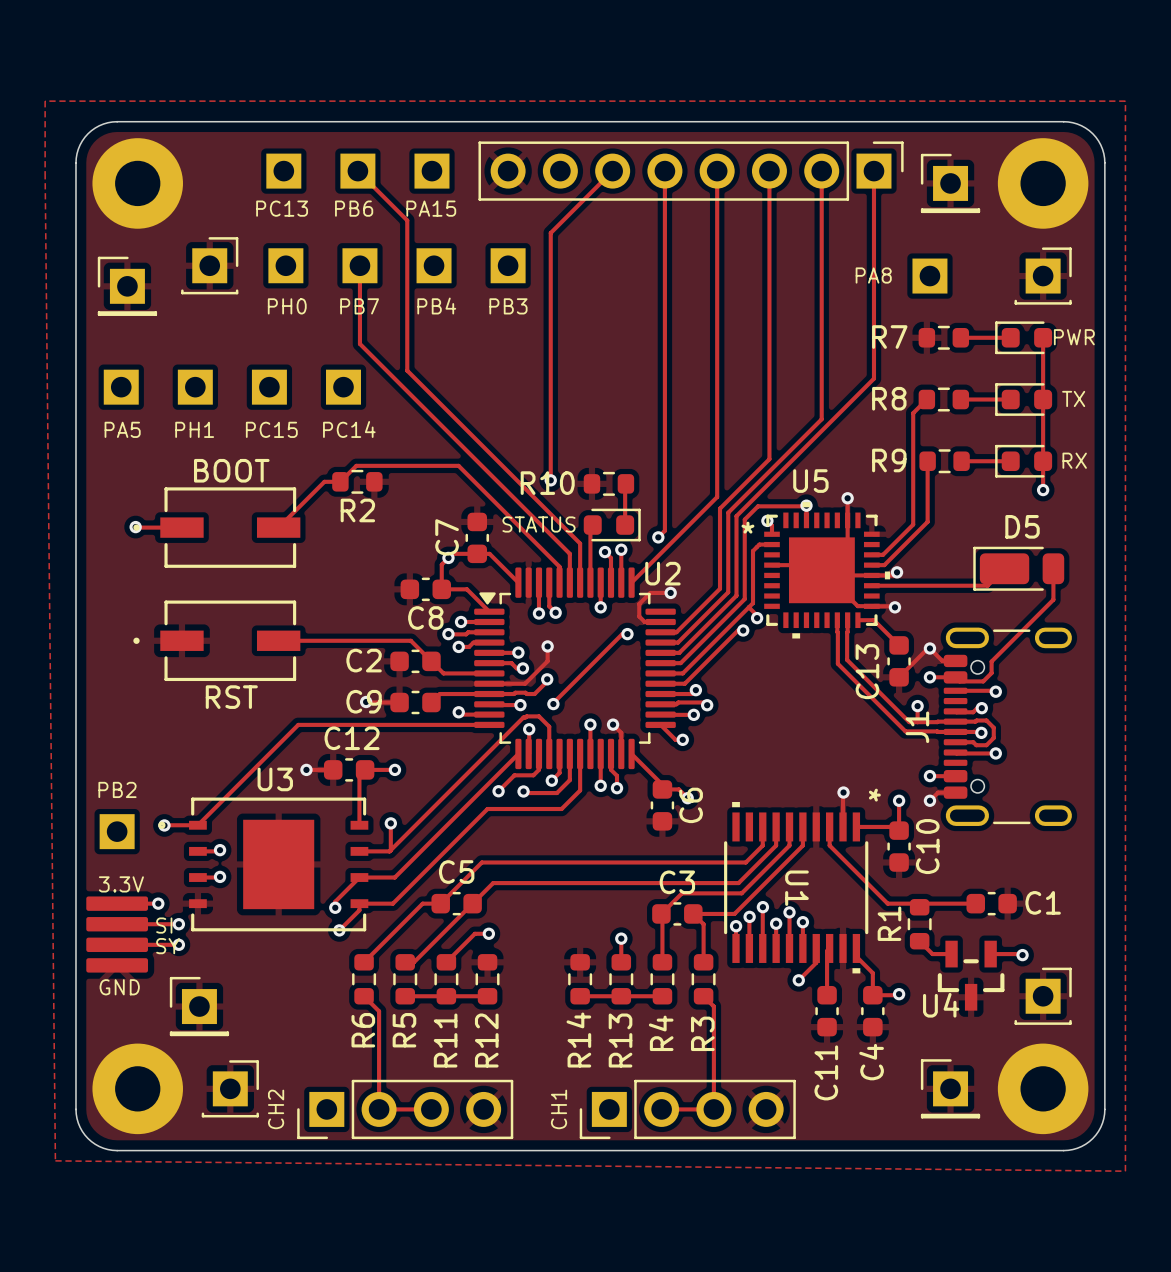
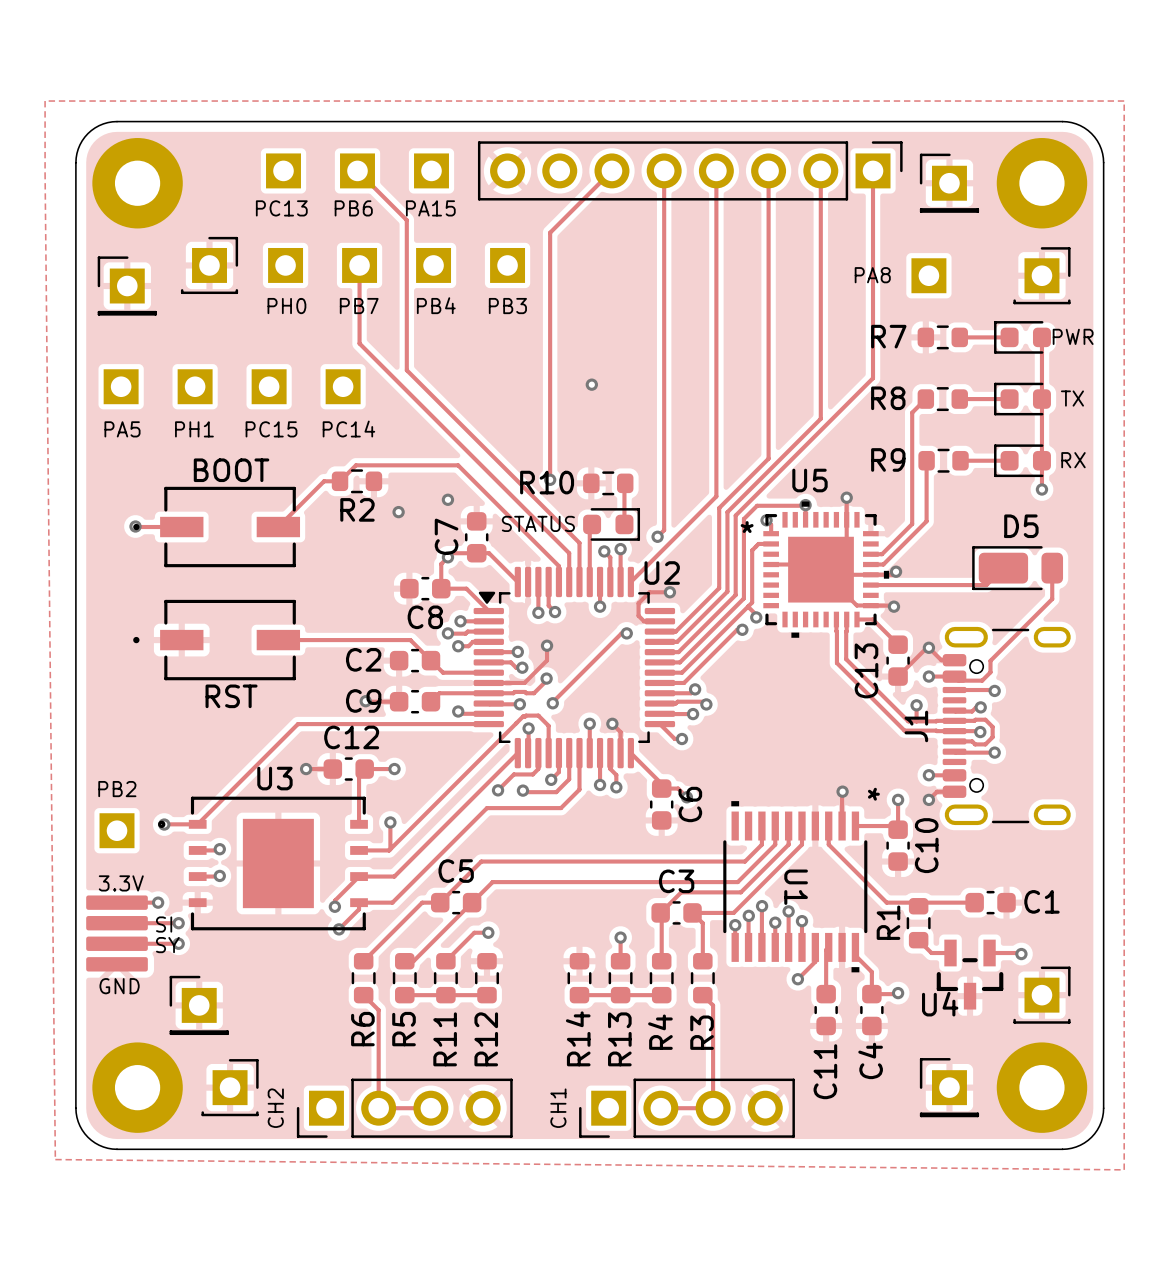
via: none -> (591, 384)
via: none -> (447, 499)
via: none -> (398, 512)

